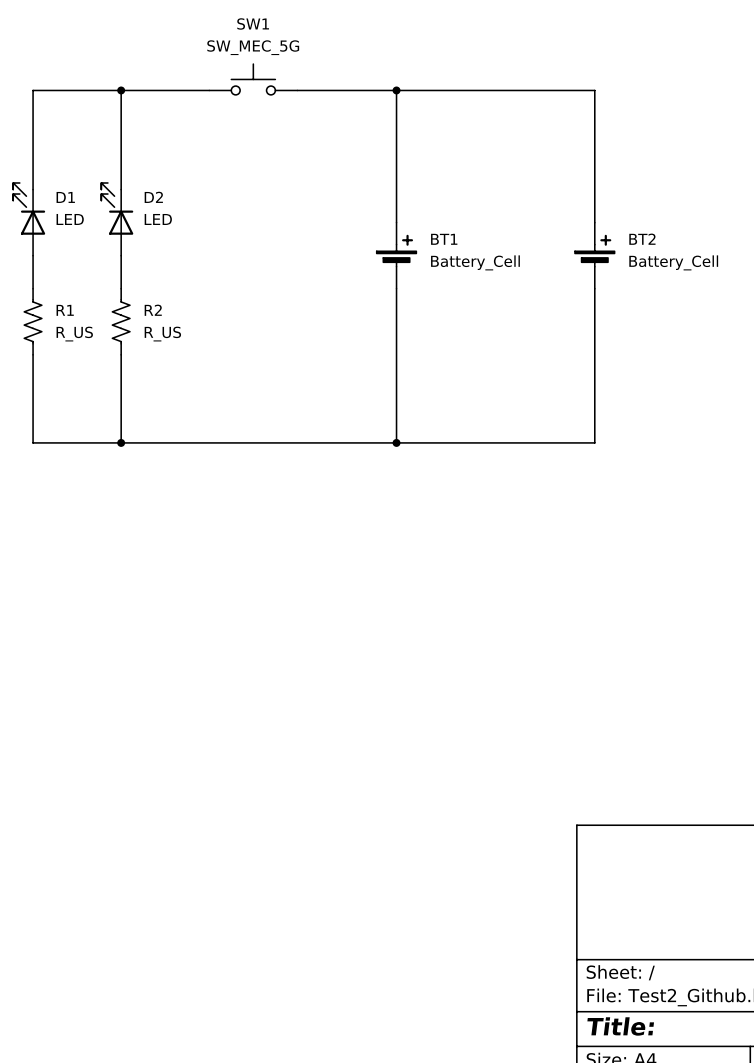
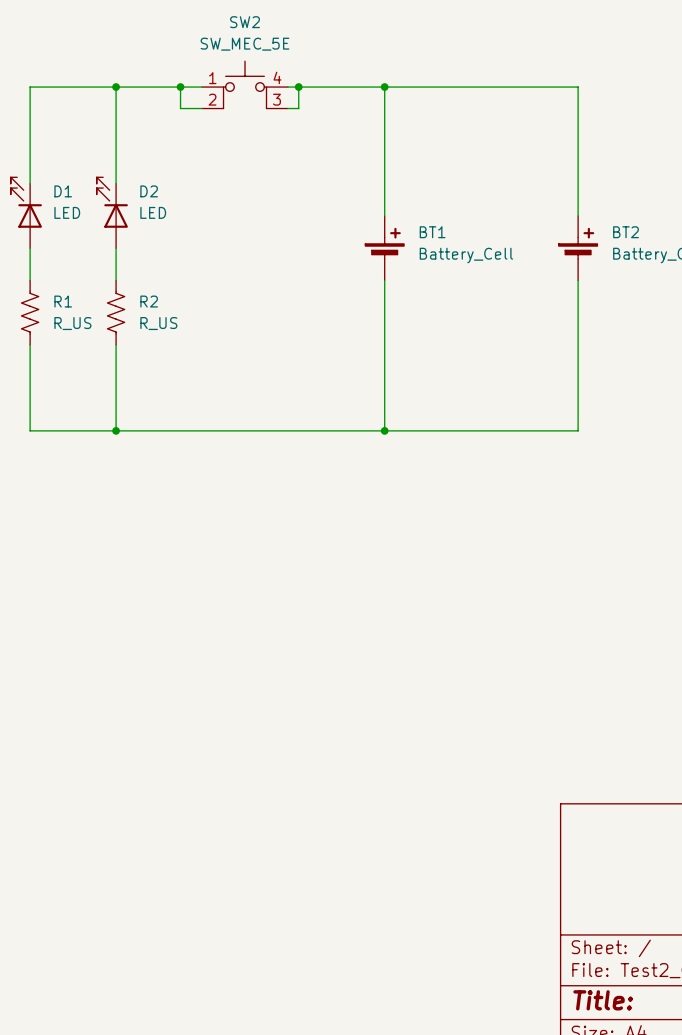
SW1: SW_MEC_5G (253, 79) -> none
SW2: none -> SW_MEC_5E (245, 84)
wire: none -> (180, 87) (180, 108) (202, 108)
junction: none -> (180, 87)
wire: none -> (298, 87) (298, 108) (287, 108)
junction: none -> (298, 87)

